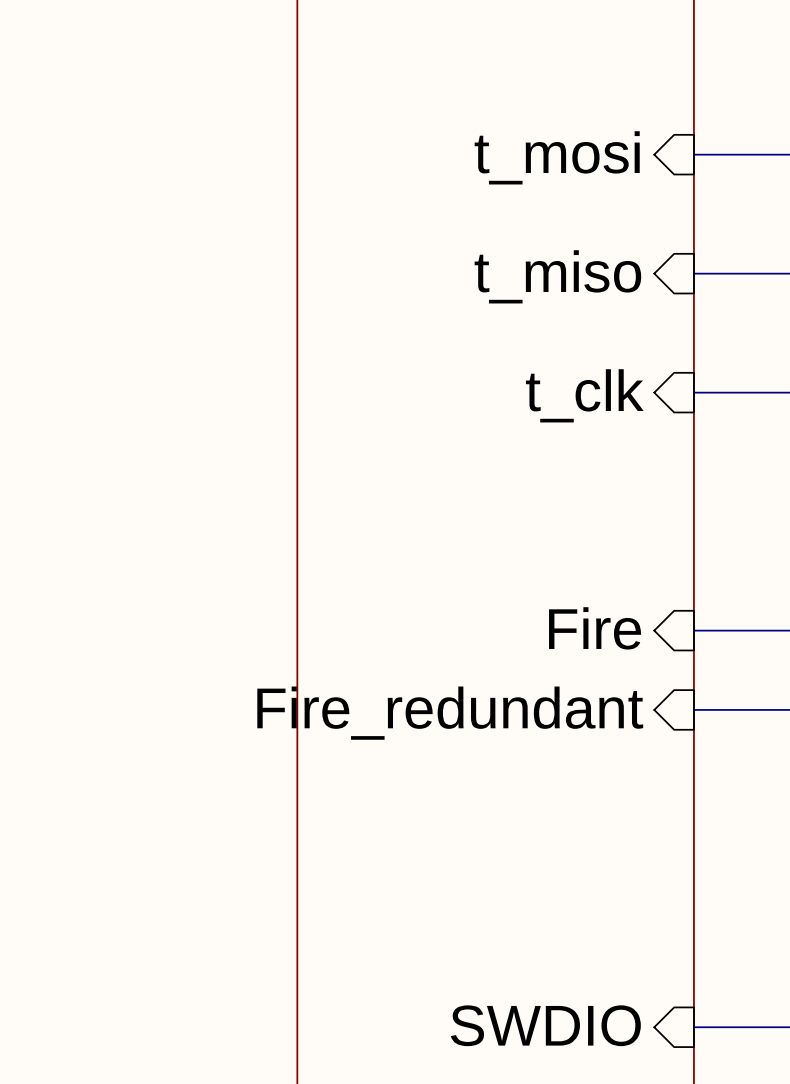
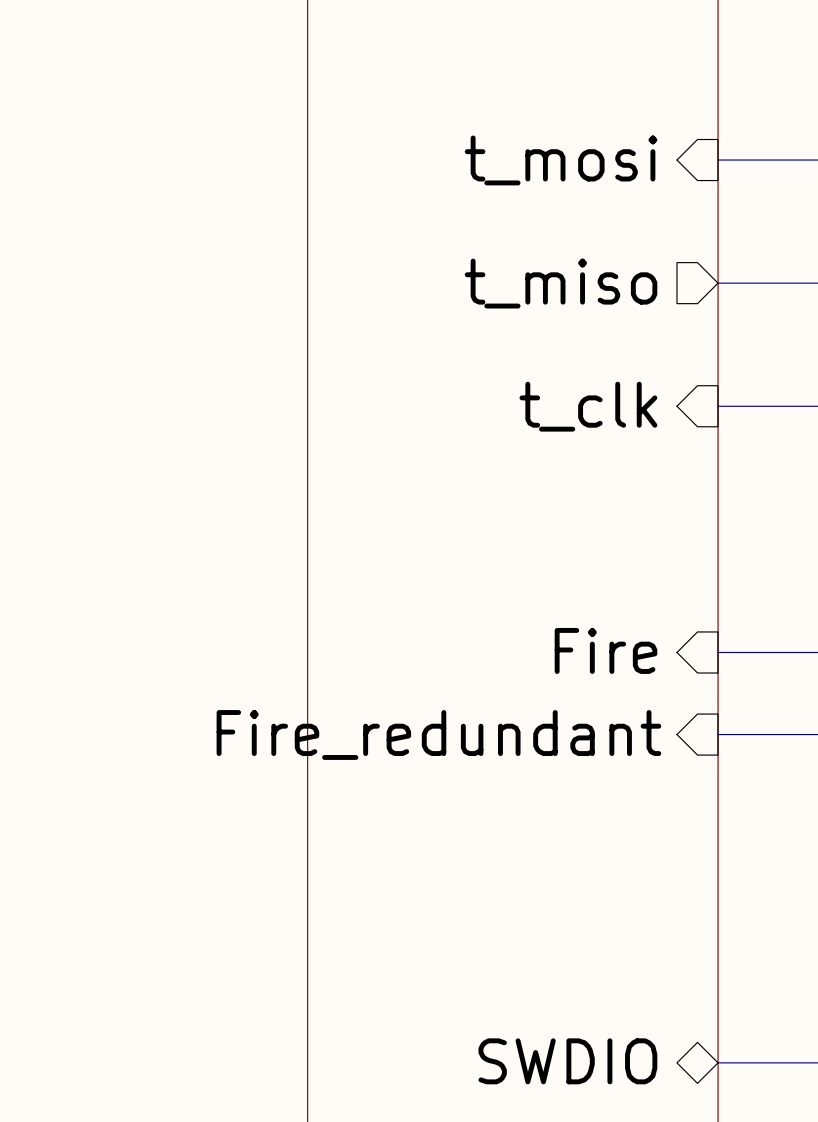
sheet pin shape: input (557, 276) -> output (561, 283)
sheet pin shape: input (545, 1025) -> bidirectional (567, 1061)

